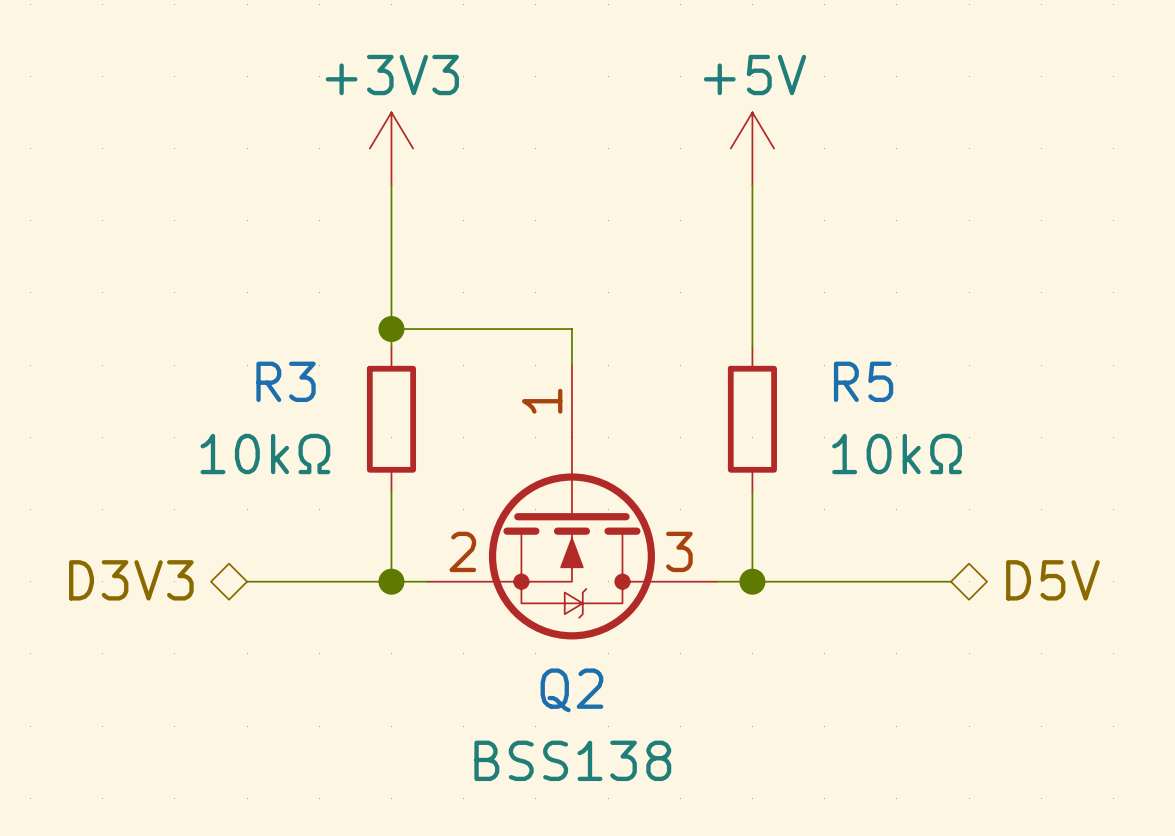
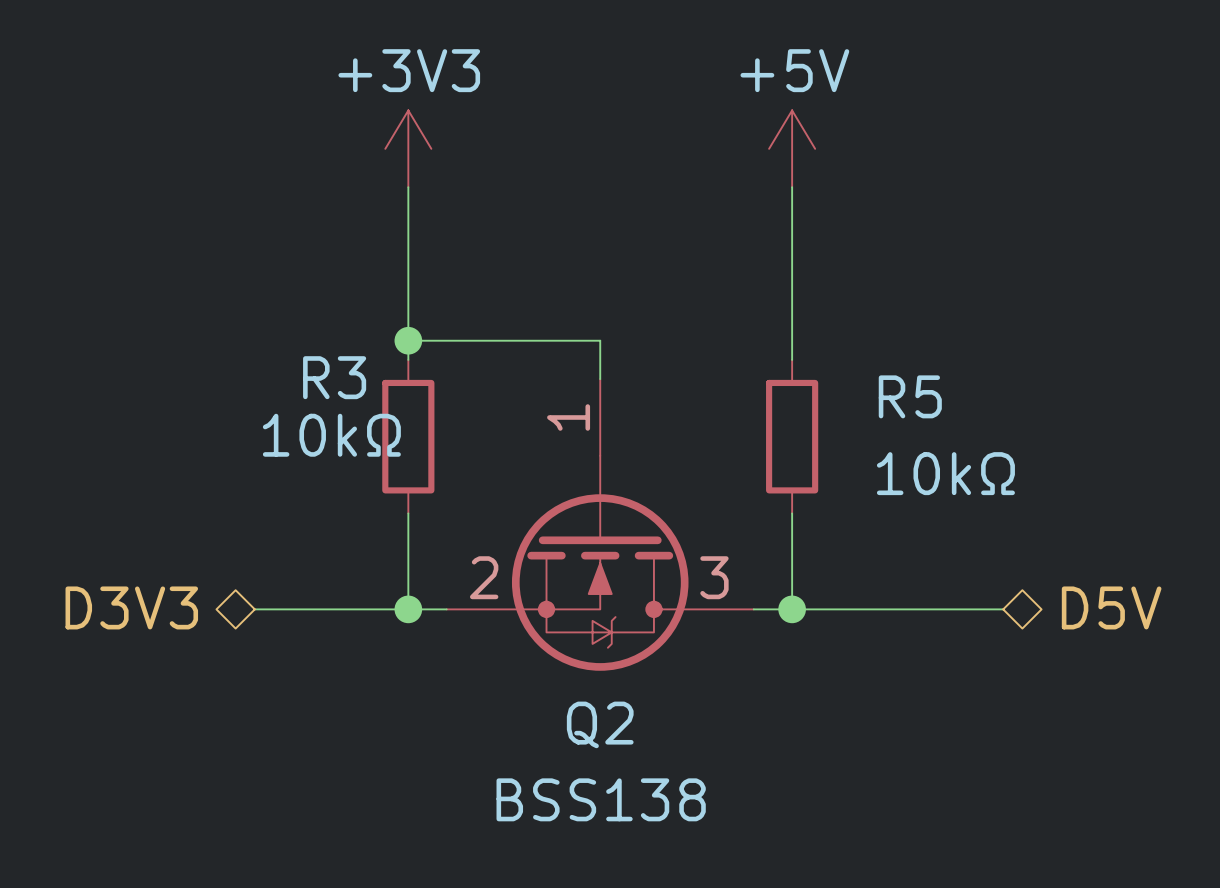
R3 name position: R3 (286, 381) -> R3 (334, 377)
R3 value position: 10kΩ (265, 454) -> 10kΩ (331, 435)

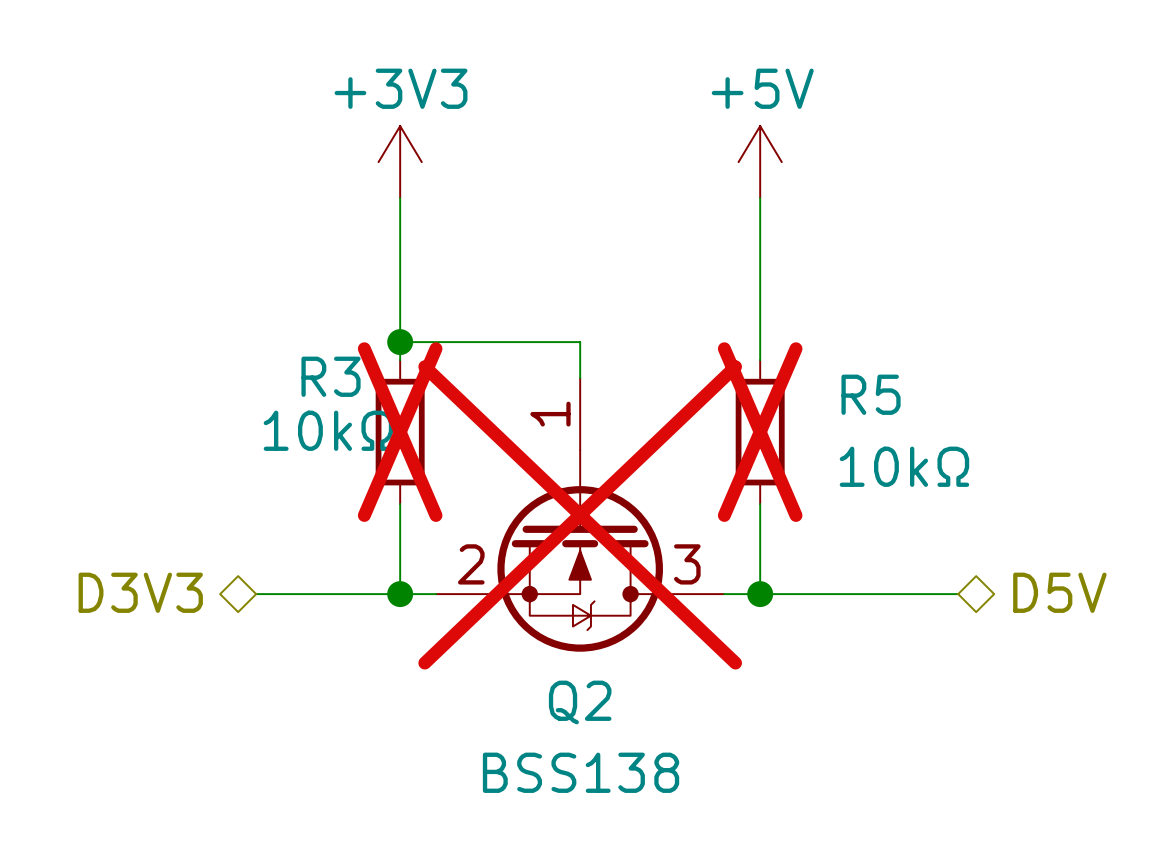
R3 do-not-place cross: none -> (400, 432)
R5 do-not-place cross: none -> (760, 432)
Q2 do-not-place cross: none -> (580, 514)

